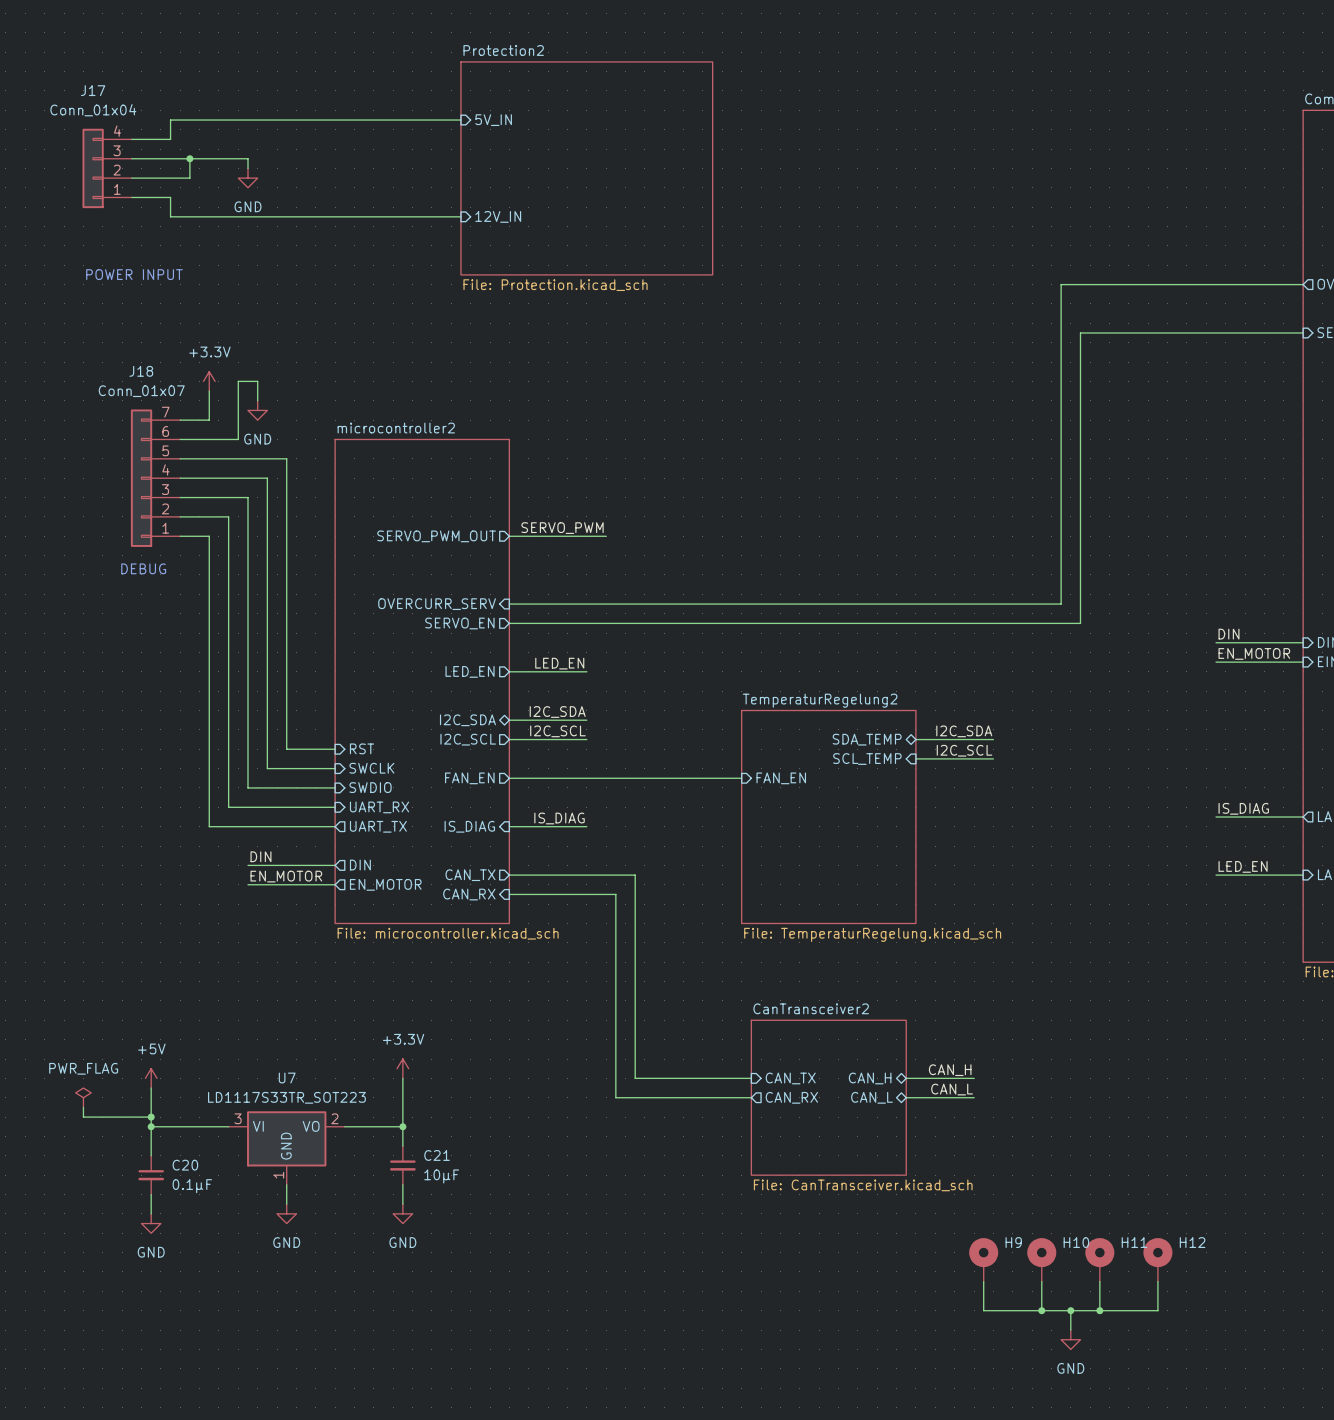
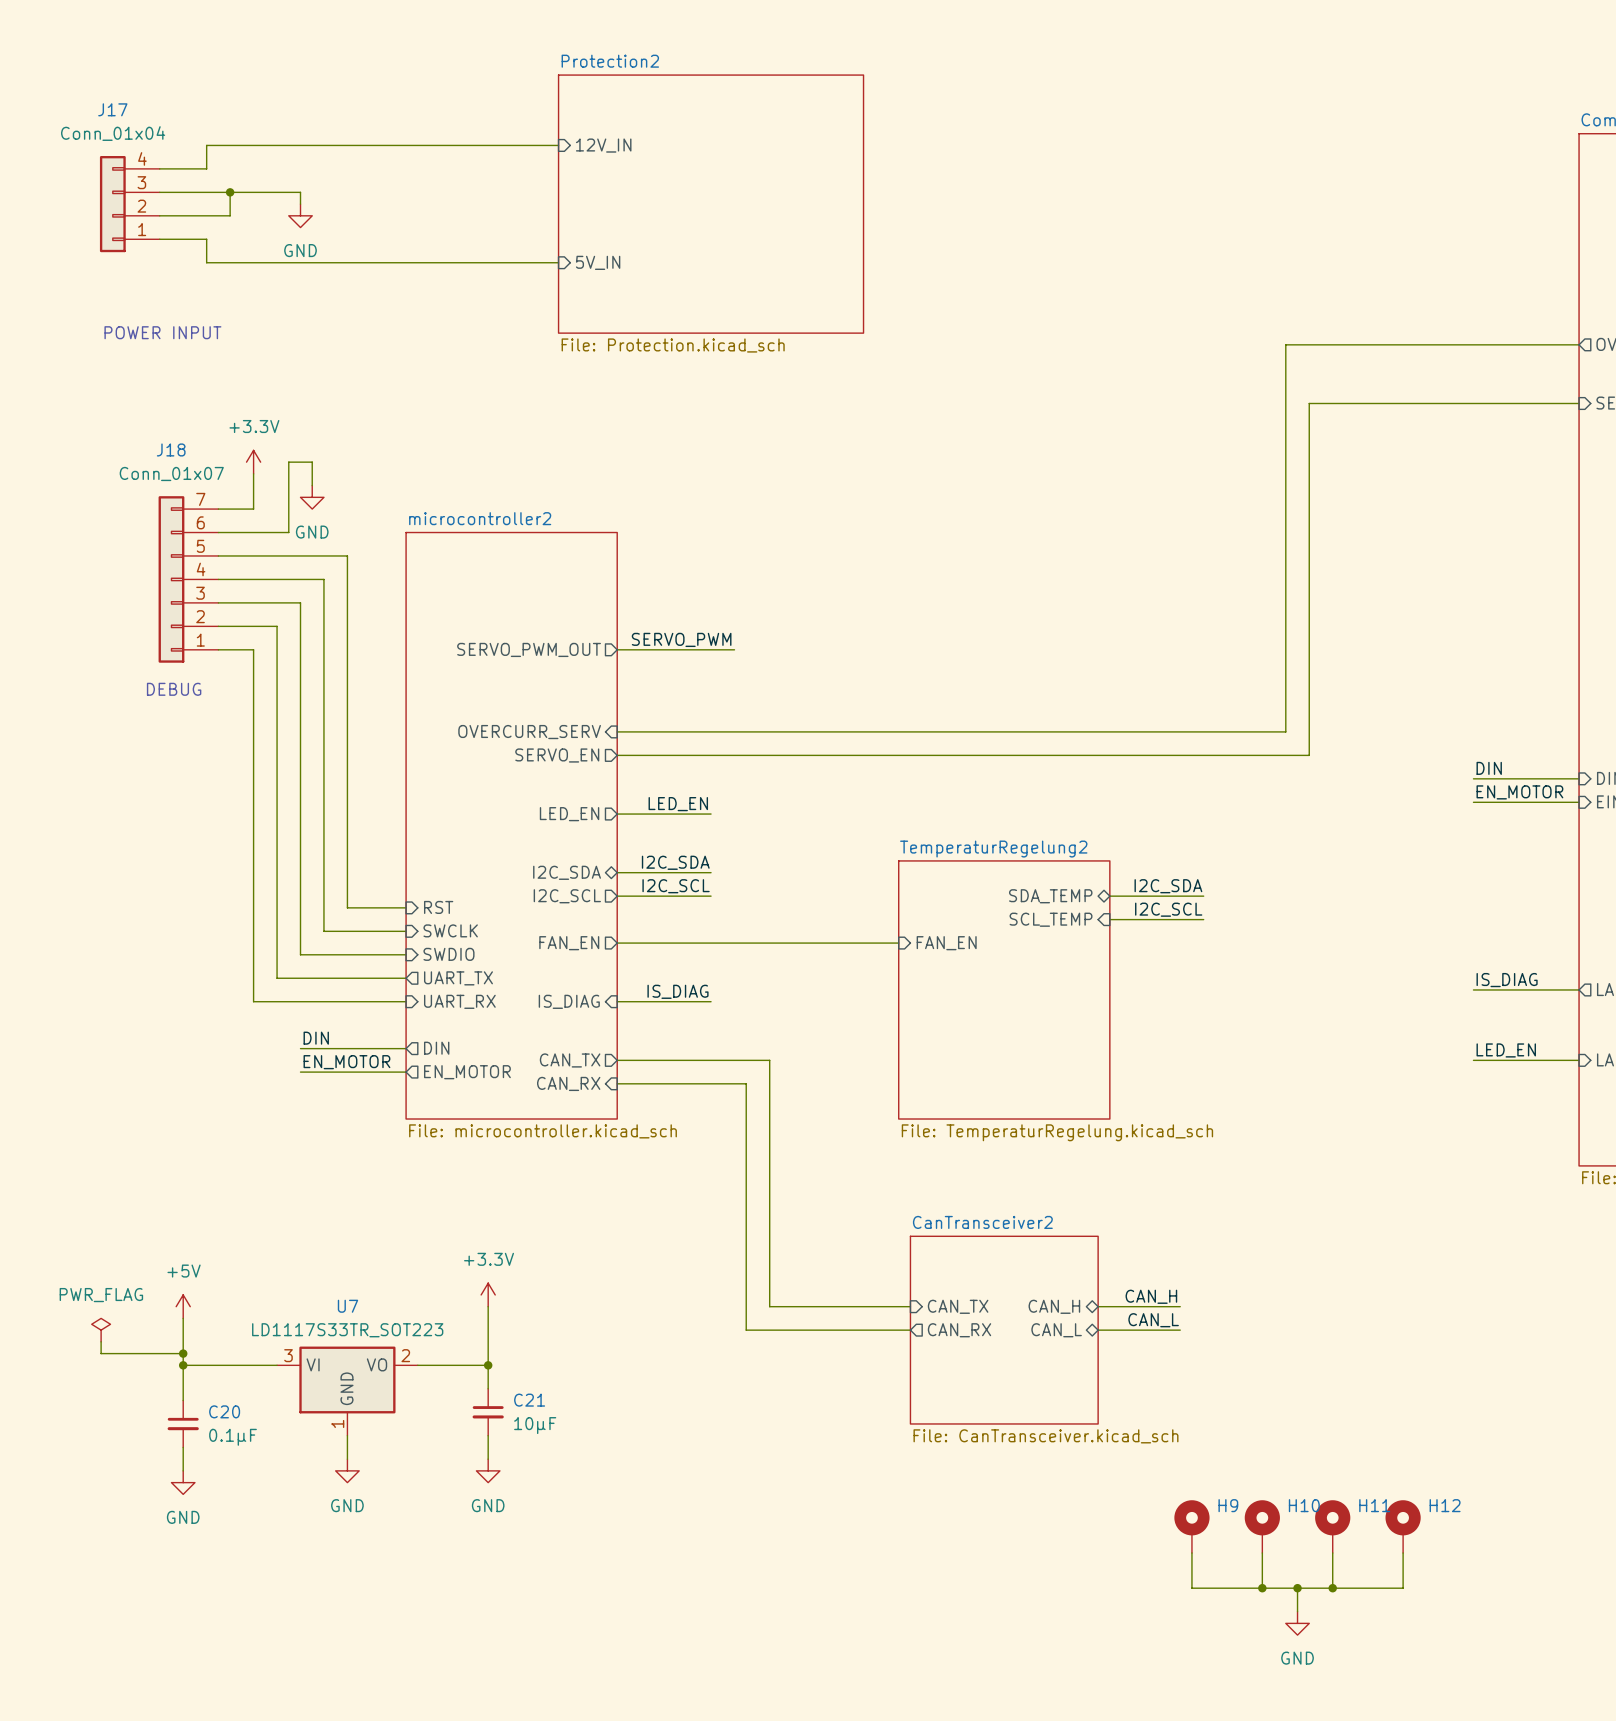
sheet pin: 5V_IN (493, 120) -> 12V_IN (603, 145)
sheet pin: 12V_IN (498, 216) -> 5V_IN (598, 262)
sheet pin shape: input (379, 807) -> output (458, 978)
sheet pin: UART_RX (379, 807) -> UART_TX (458, 978)
sheet pin shape: output (378, 826) -> input (459, 1001)
sheet pin: UART_TX (378, 826) -> UART_RX (459, 1001)

